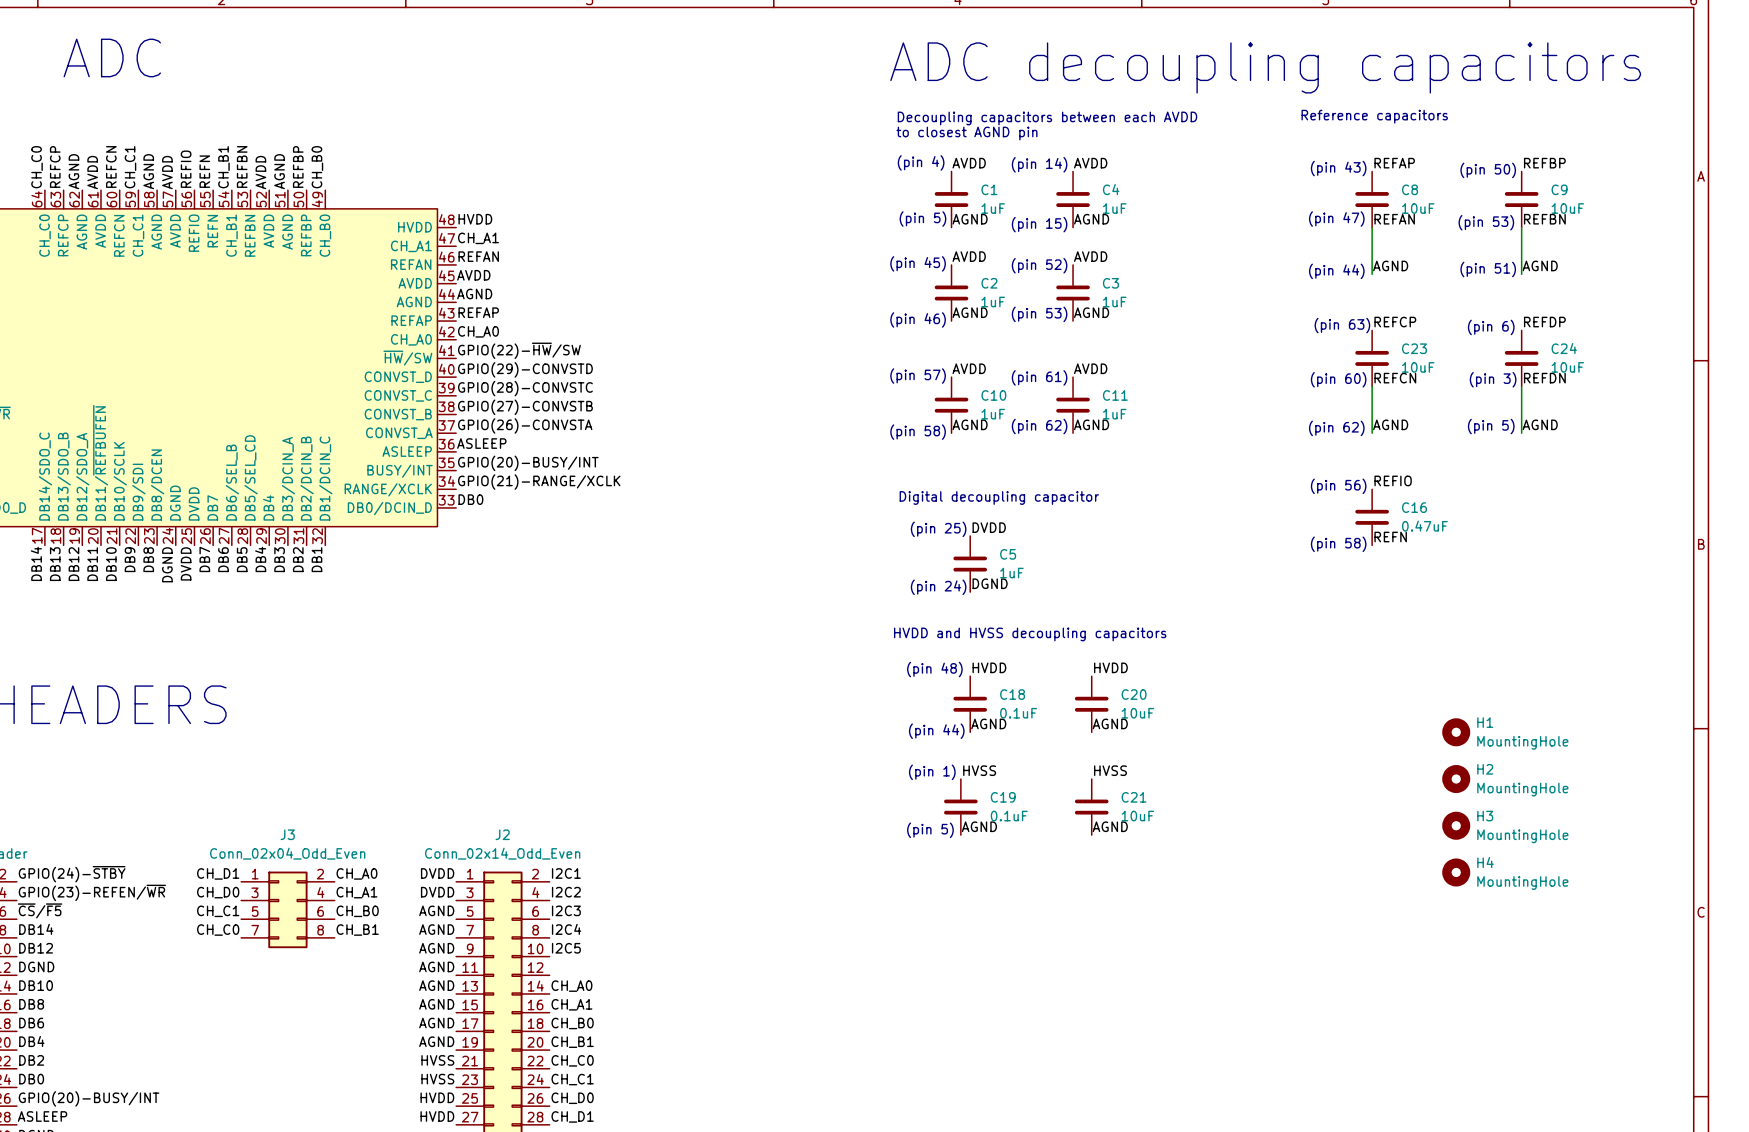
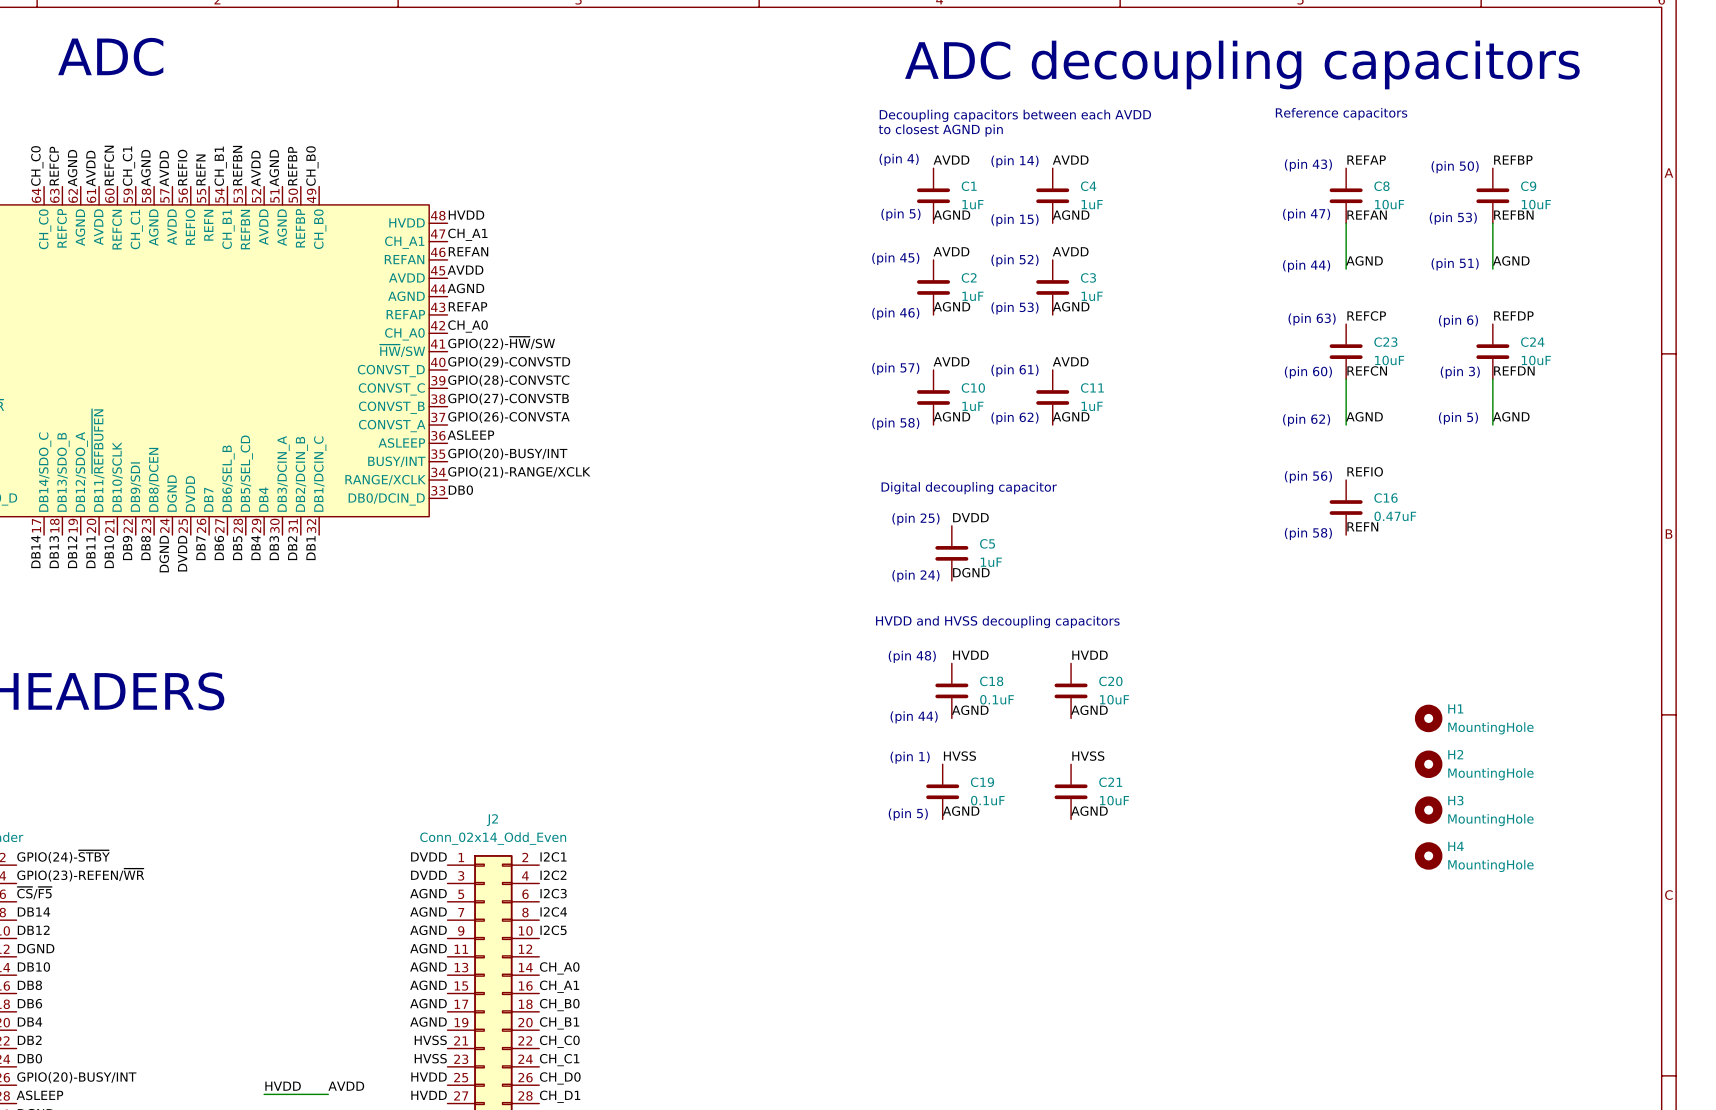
label: CH_D1 (218, 873) -> none
label: CH_A0 (356, 873) -> none
label: CH_D0 (218, 892) -> none
label: CH_A1 (356, 892) -> none
J3: Conn_02x04_Odd_Even (287, 909) -> none
label: CH_C1 (218, 911) -> none
label: CH_B0 (357, 911) -> none
label: CH_C0 (218, 930) -> none
label: CH_B1 (357, 930) -> none
label: none -> HVDD (283, 1086)
label: none -> AVDD (346, 1086)
wire: none -> (264, 1094) (328, 1094)

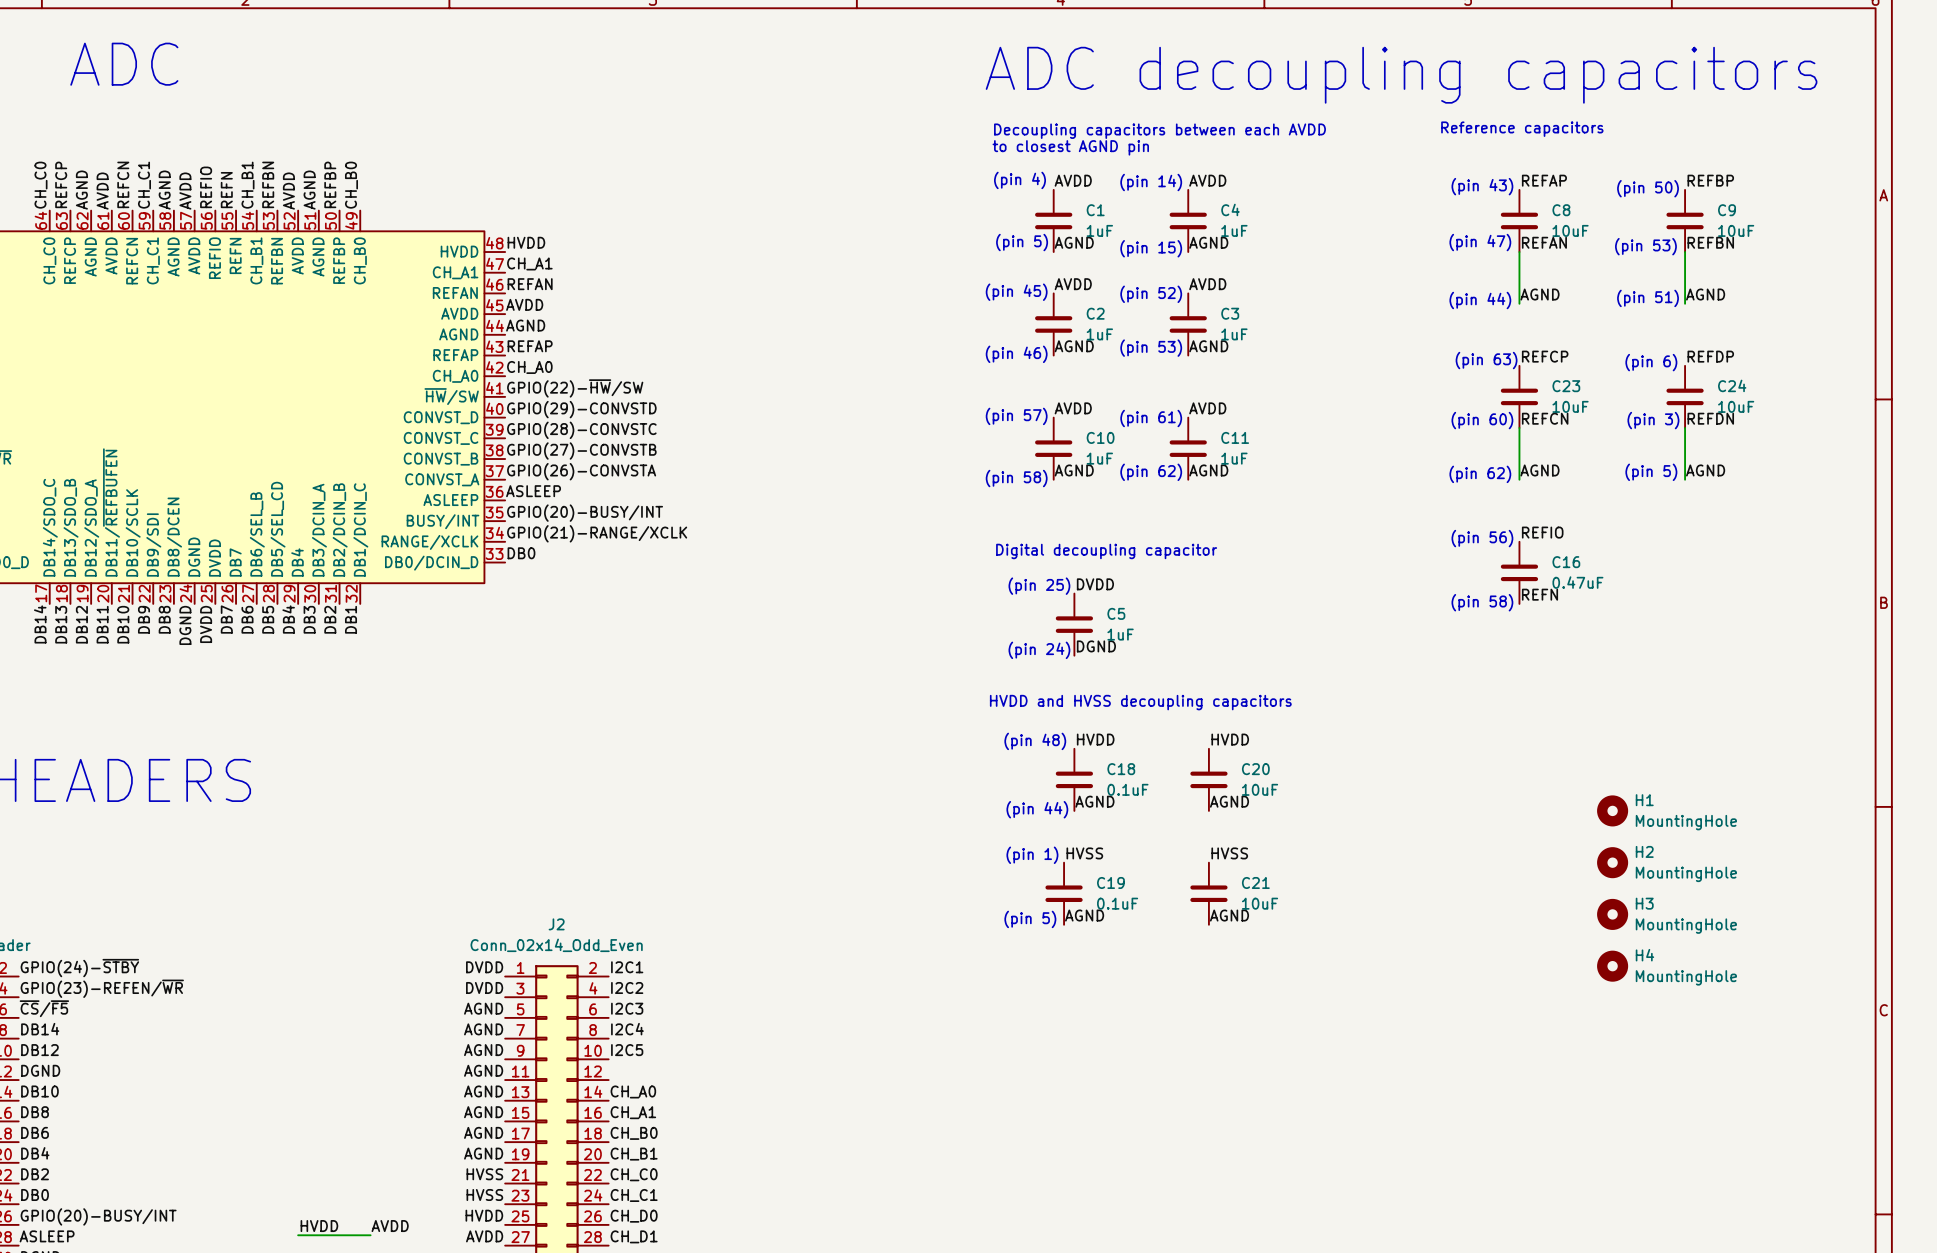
label: HVDD (429, 1095) -> AVDD (484, 1236)

